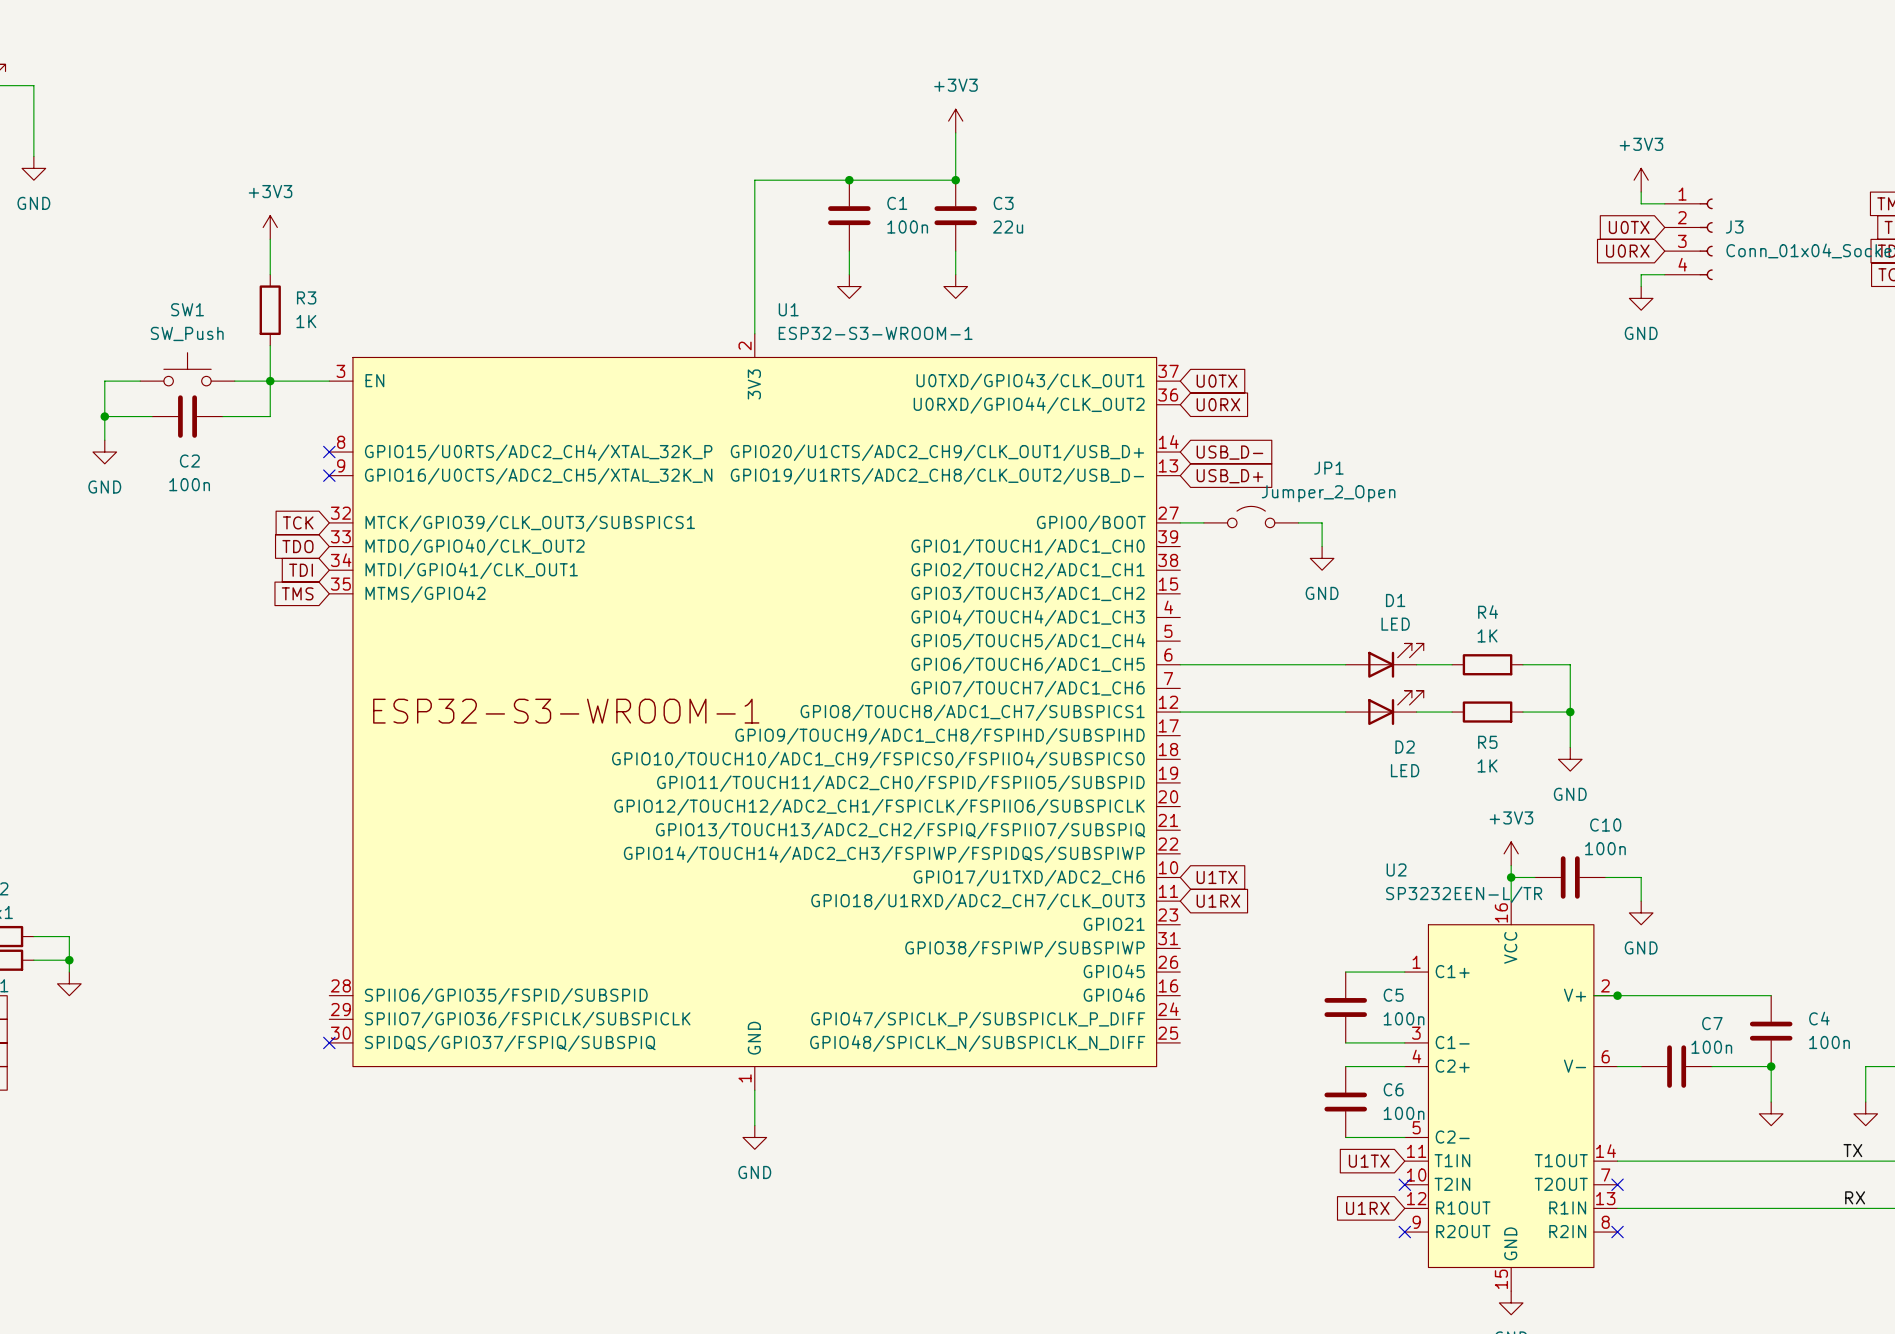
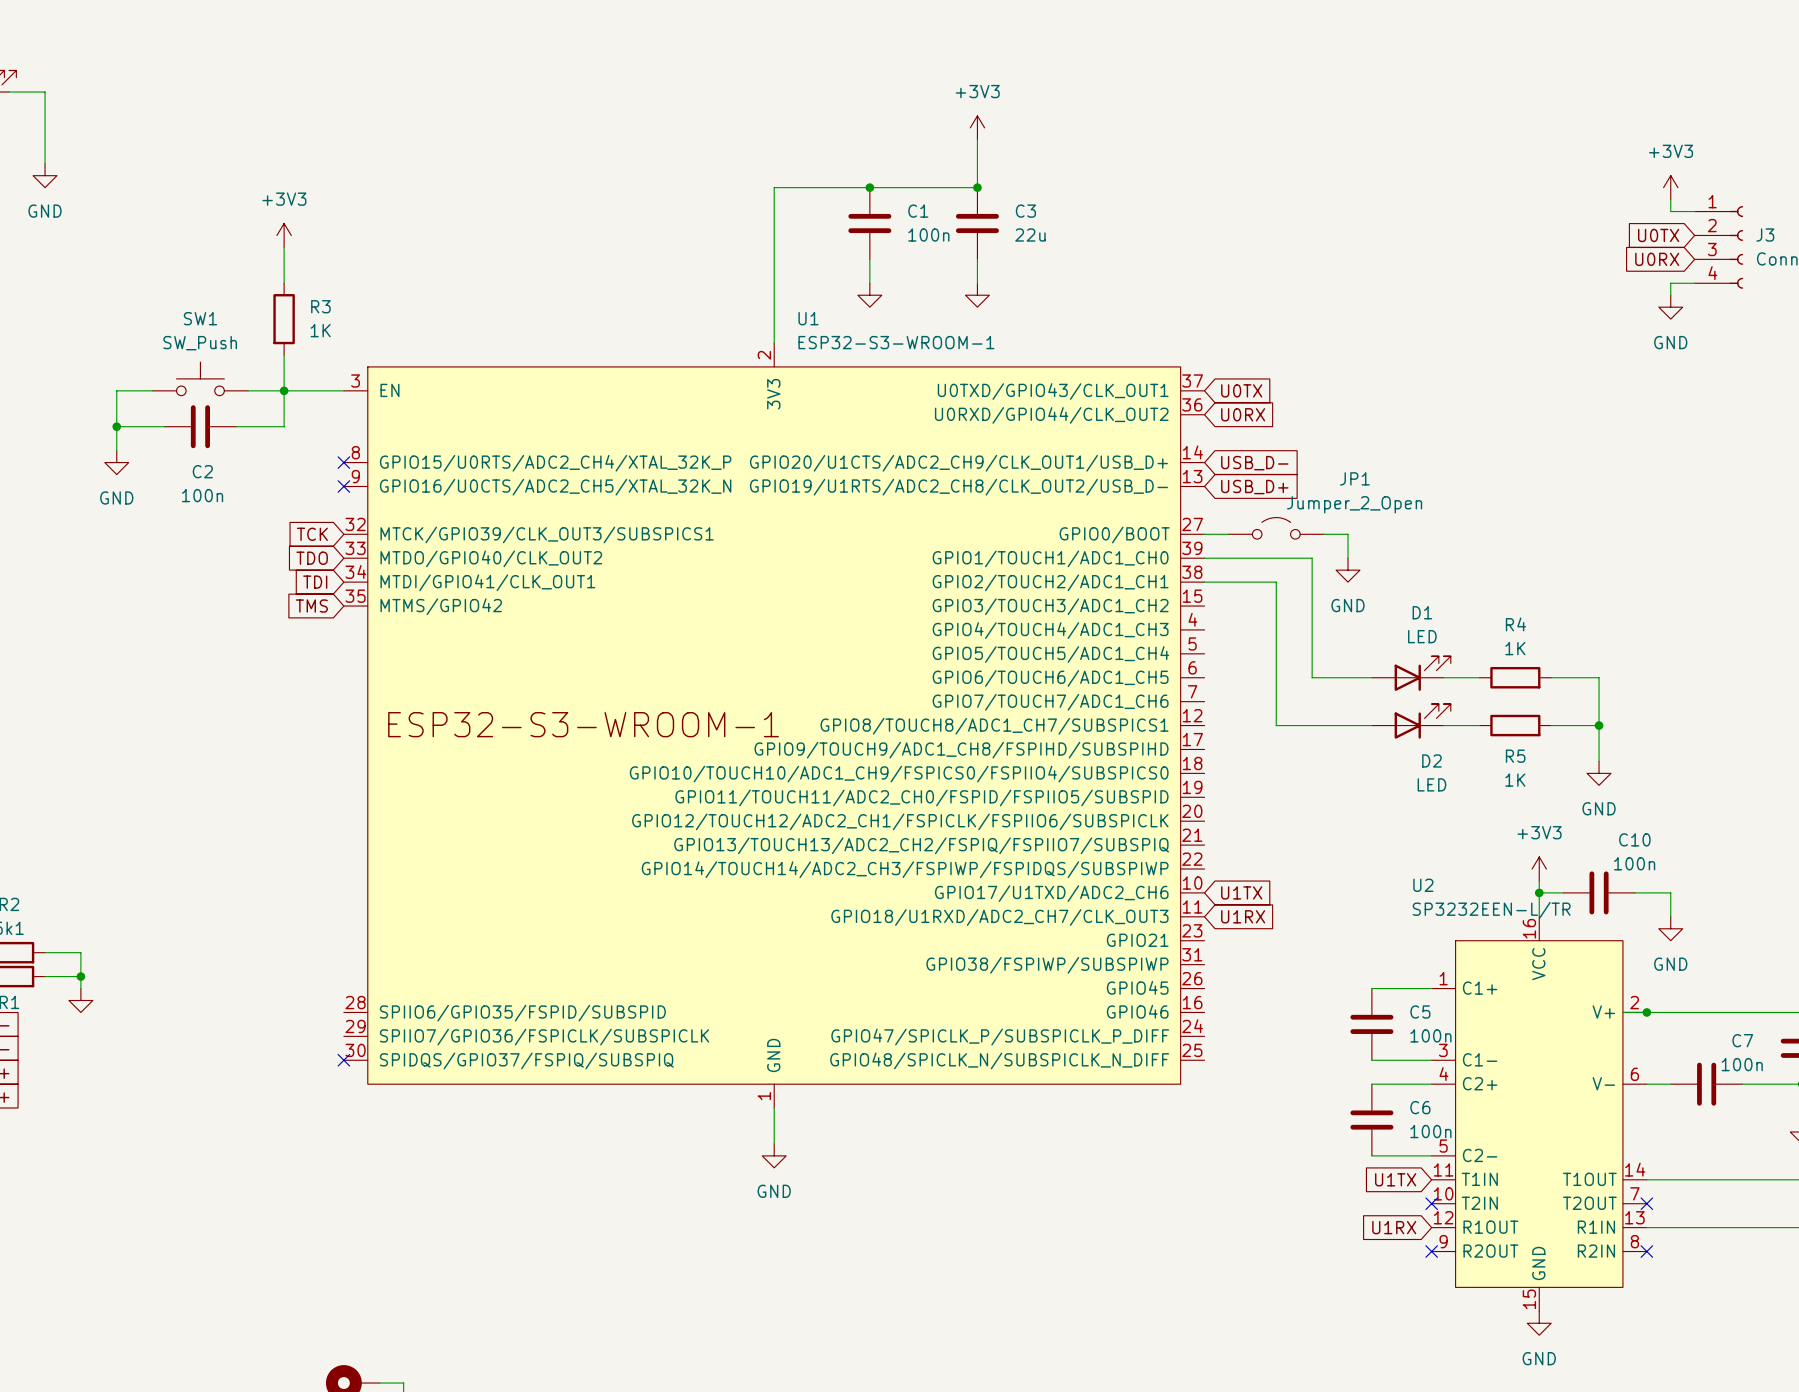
wire: (1180, 664) (1286, 664) -> (1204, 558) (1312, 558) (1312, 677)
wire: (1180, 712) (1251, 712) -> (1204, 582) (1276, 582) (1276, 725)

